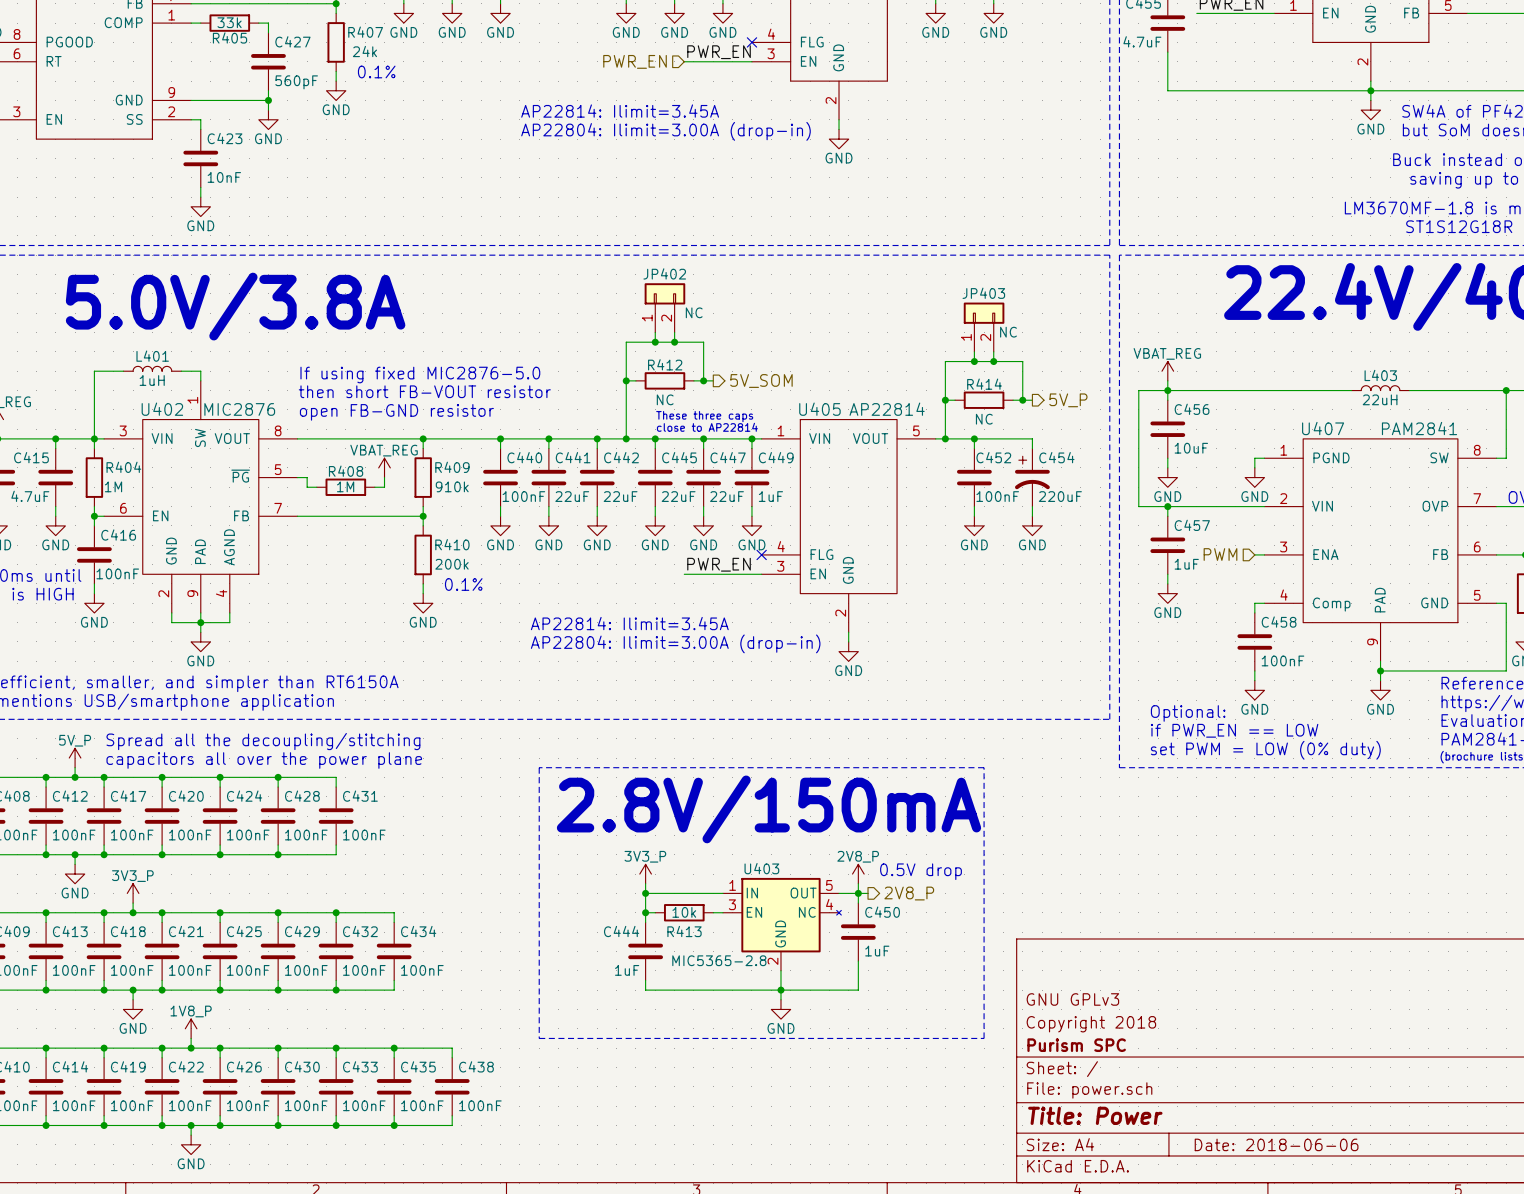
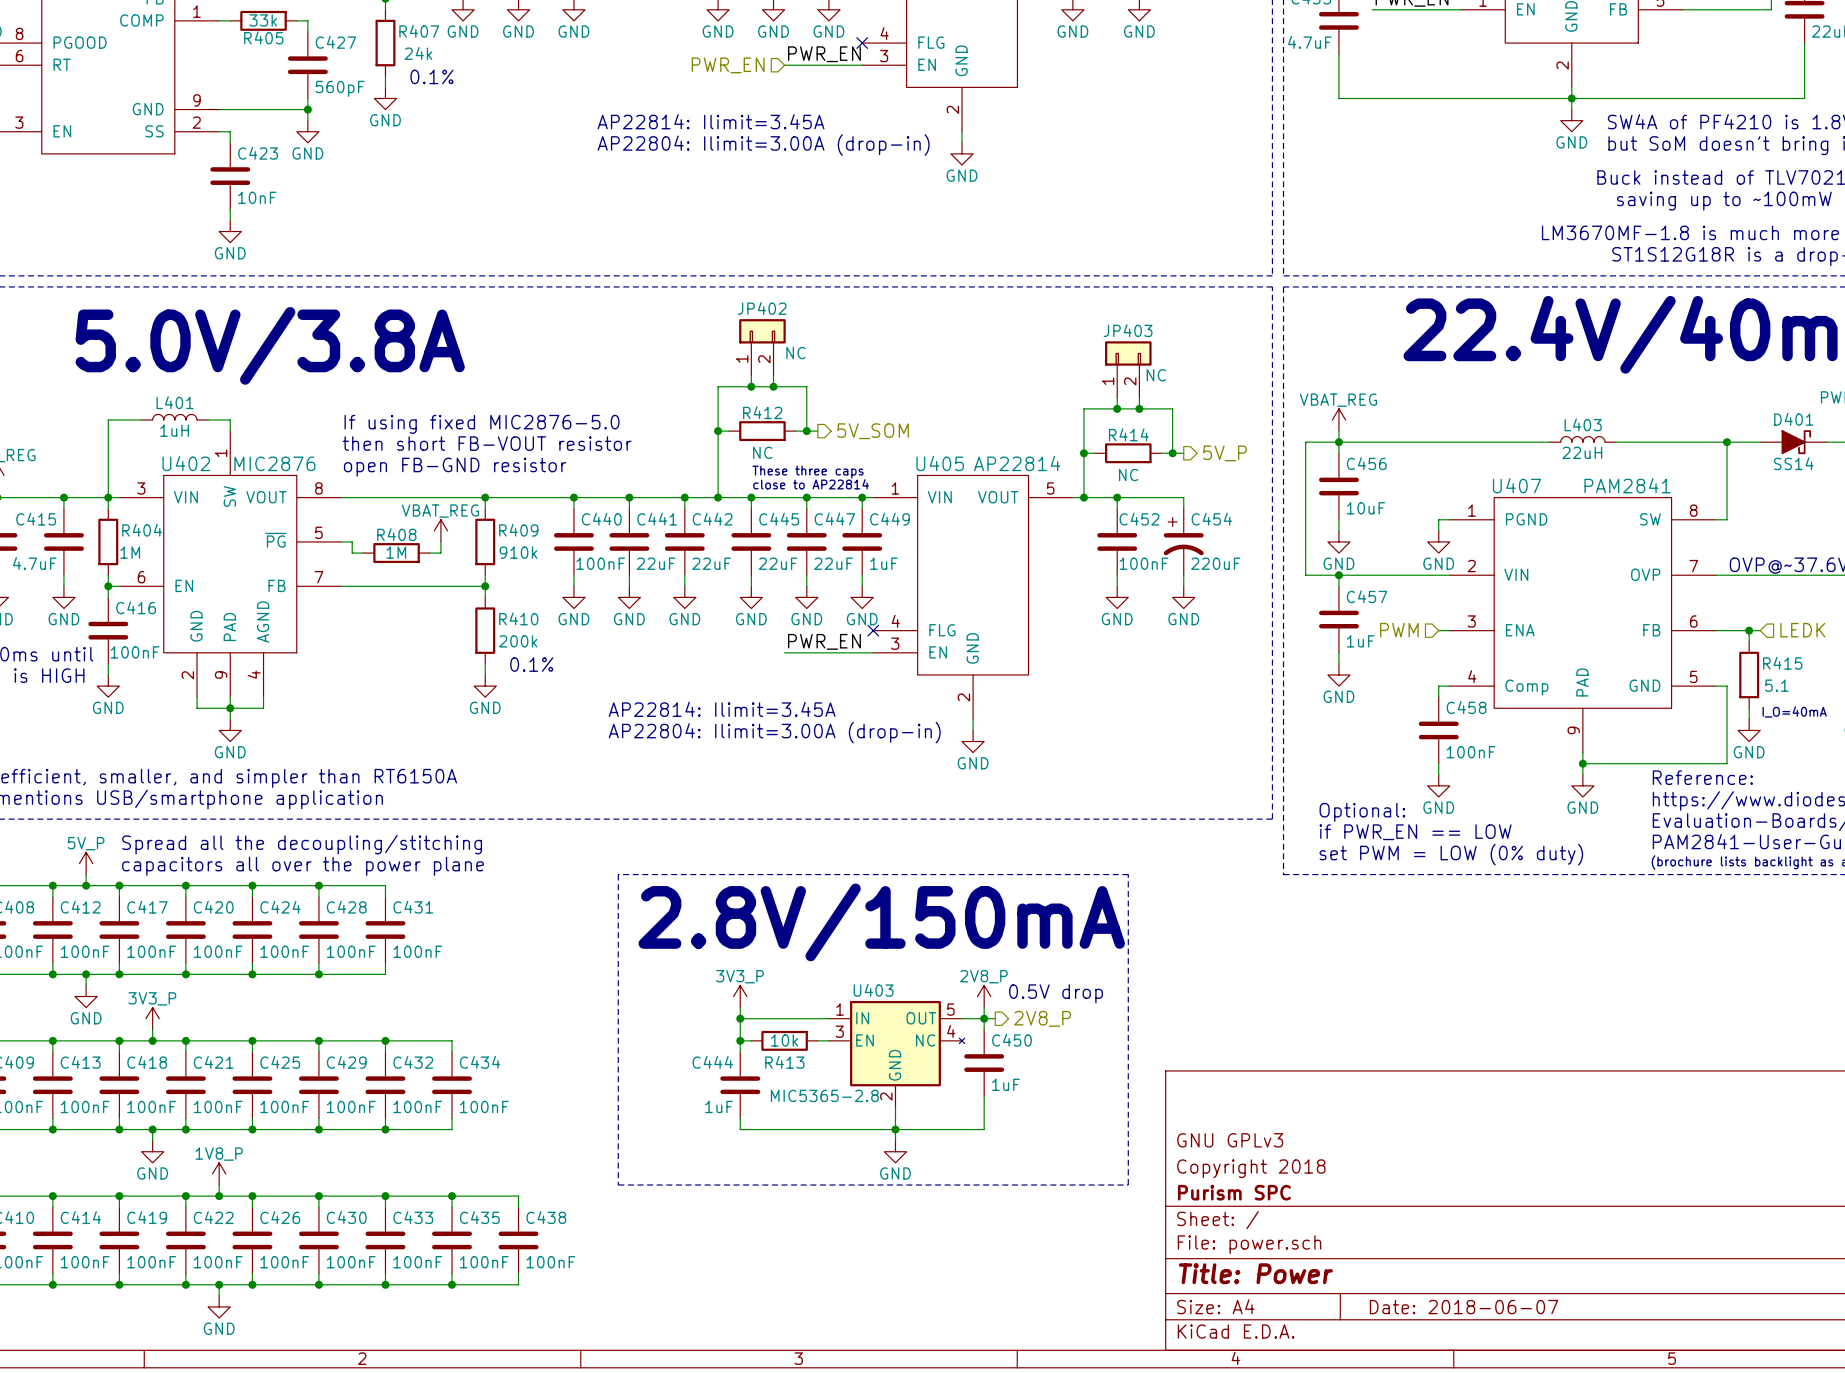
title block: Date: 2018-06-06 (1276, 1144) -> Date: 2018-06-07 (1464, 1307)

